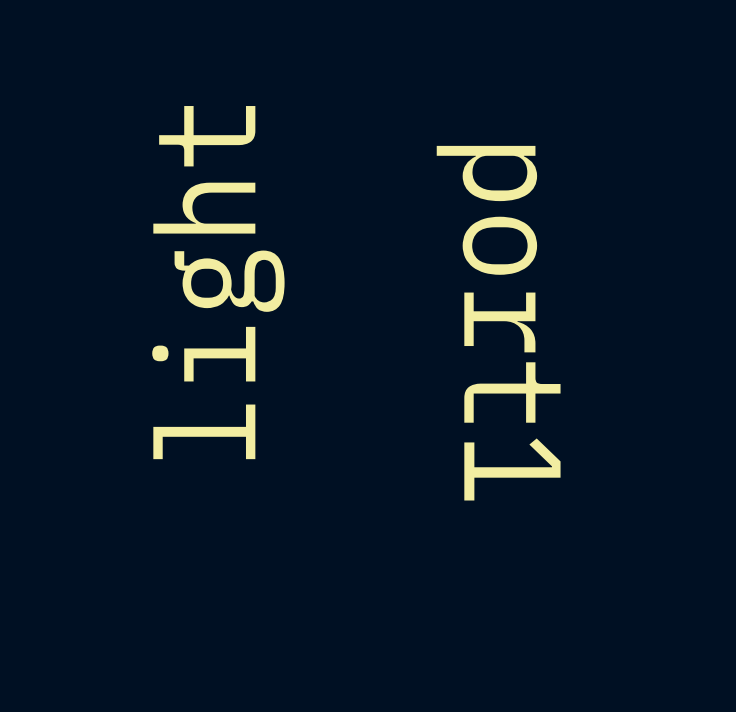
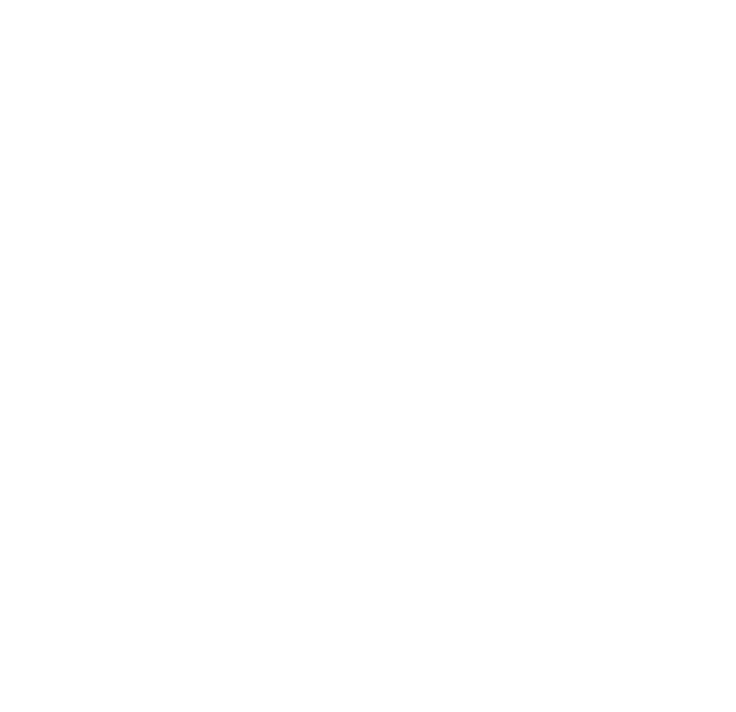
text: light (218, 282) -> none
text: port1 (498, 323) -> none

